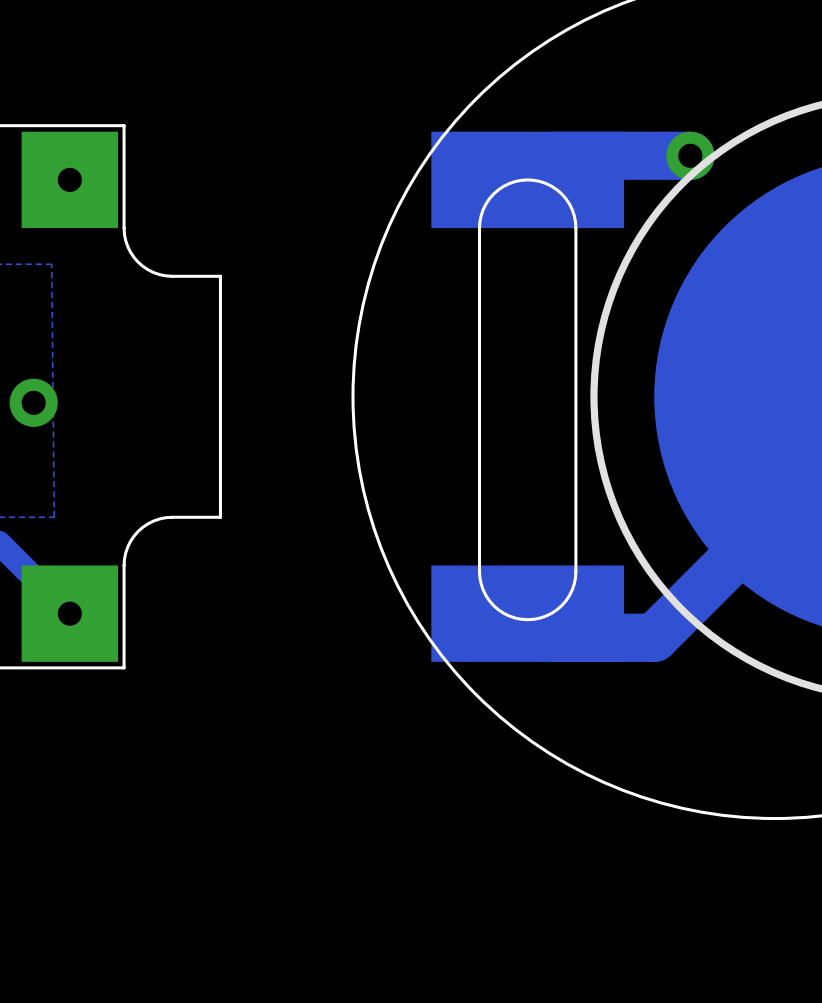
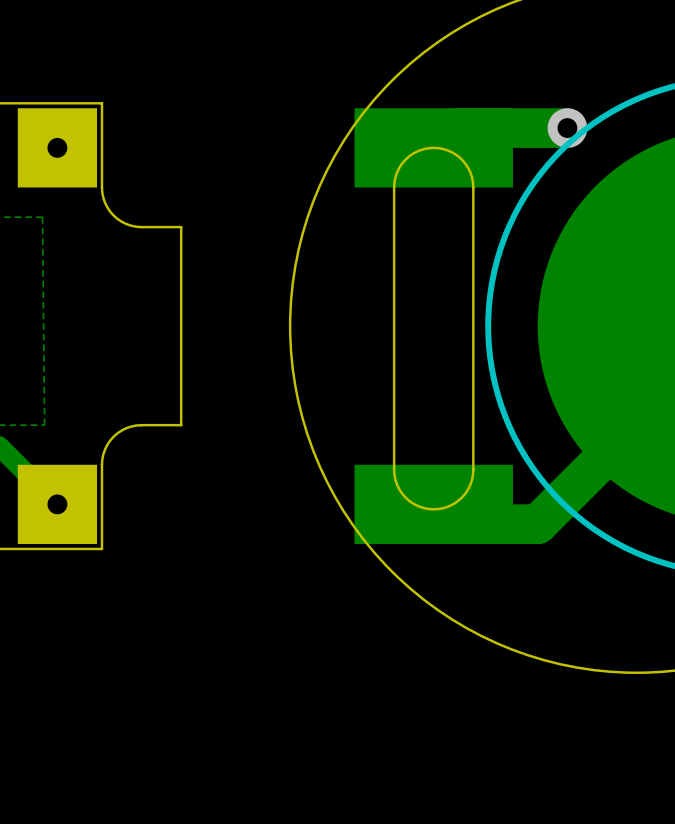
via: (33, 402) -> none

